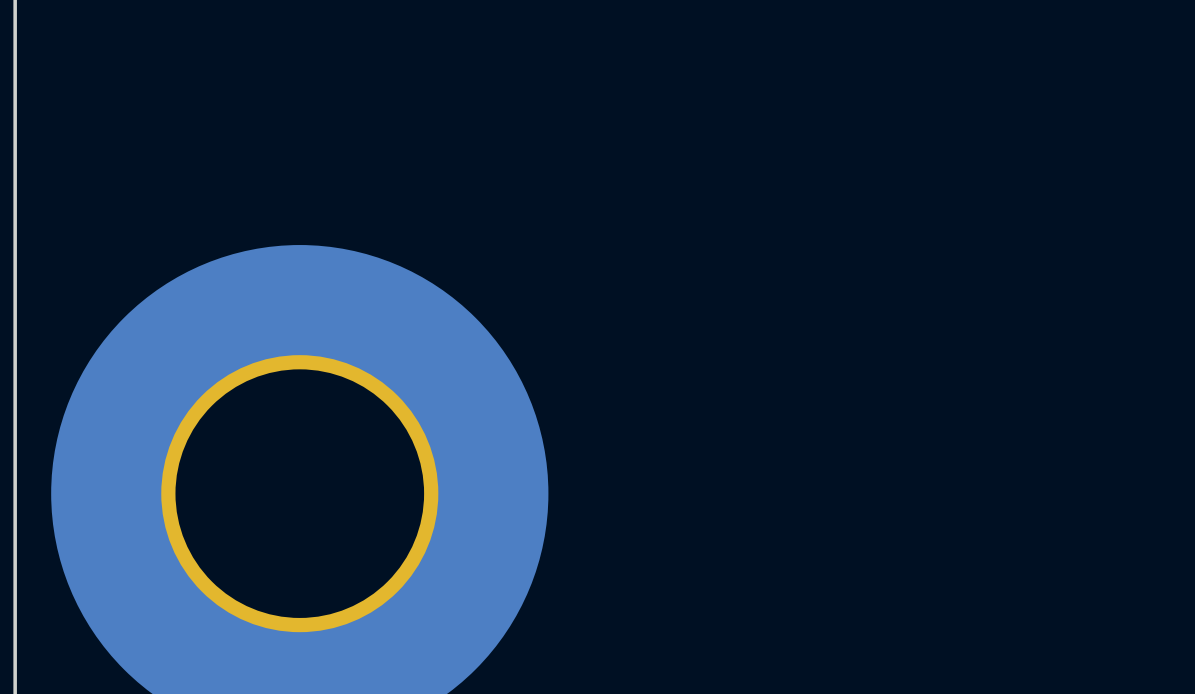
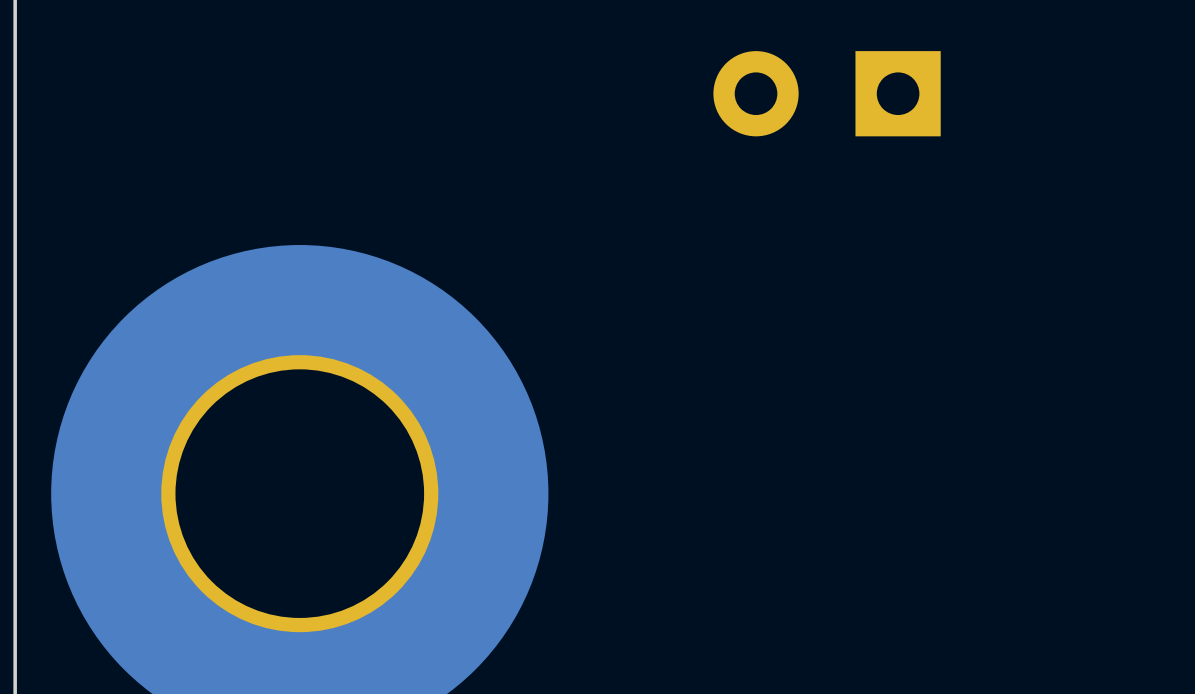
part: none -> (827, 93)

